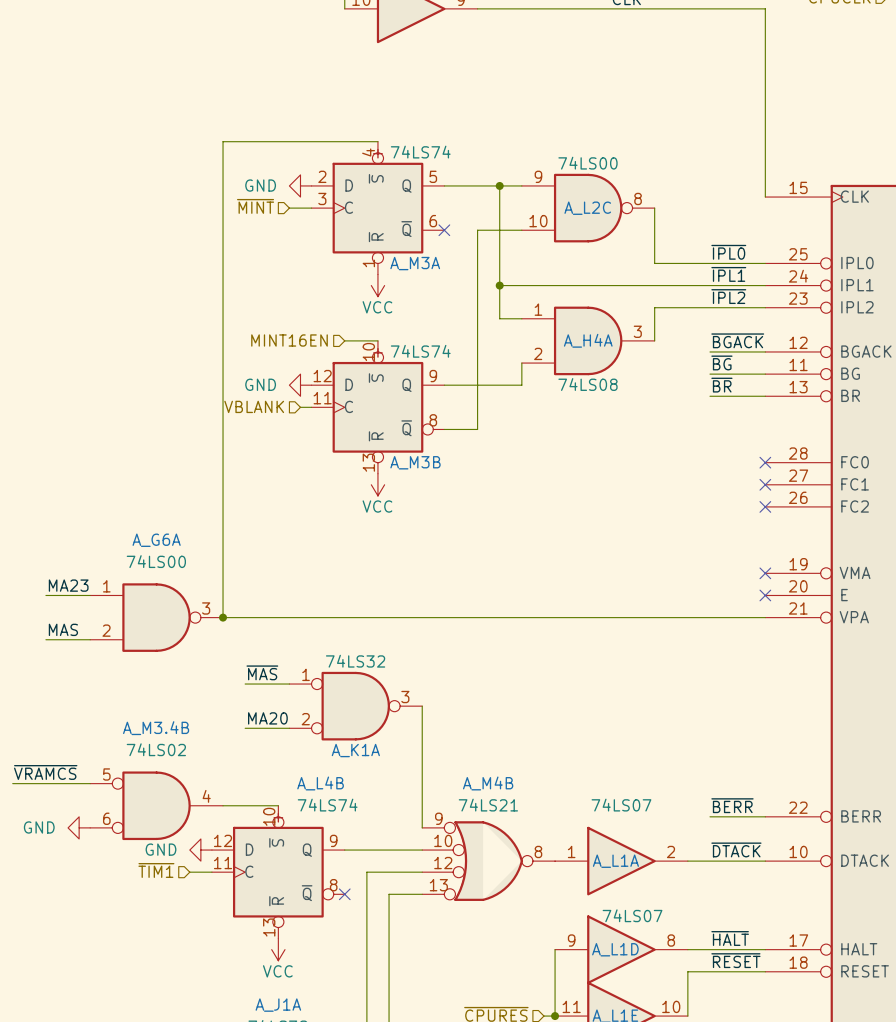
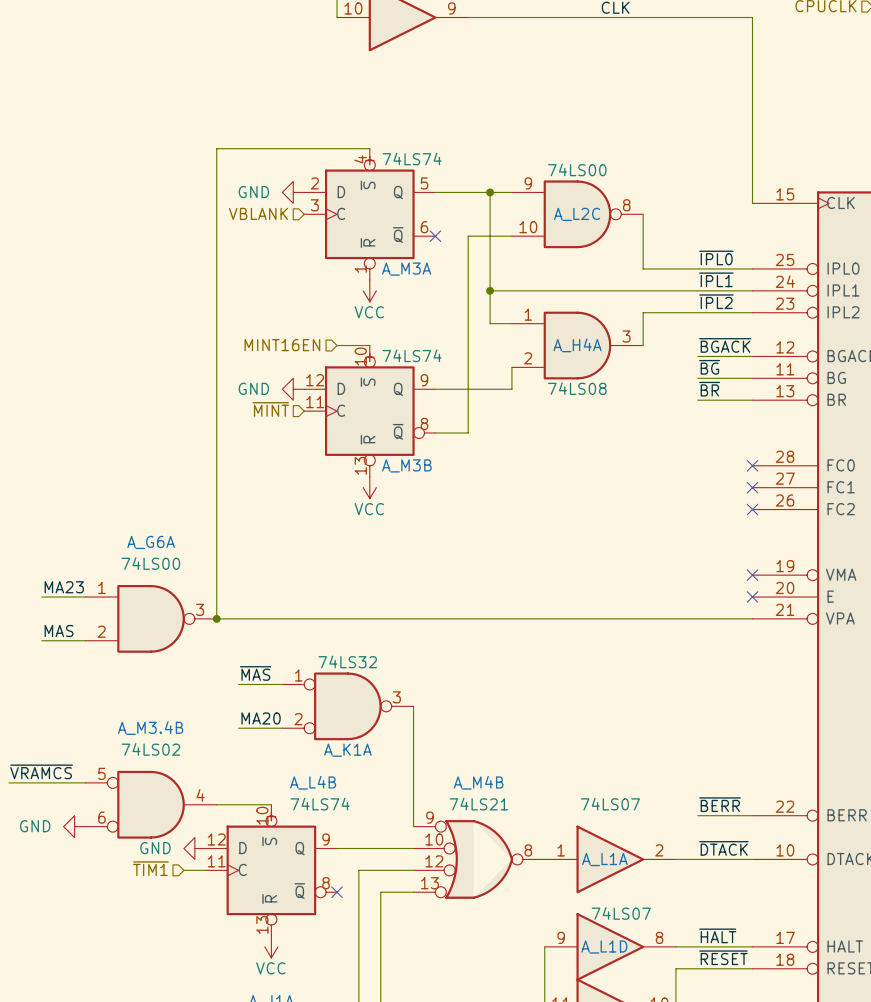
hierarchical label position: ~{MINT} (255, 206) -> ~{MINT} (270, 409)
wire: (289, 208) (311, 208) -> none
hierarchical label position: VBLANK (254, 406) -> VBLANK (258, 213)
wire: (300, 407) (311, 407) -> none

